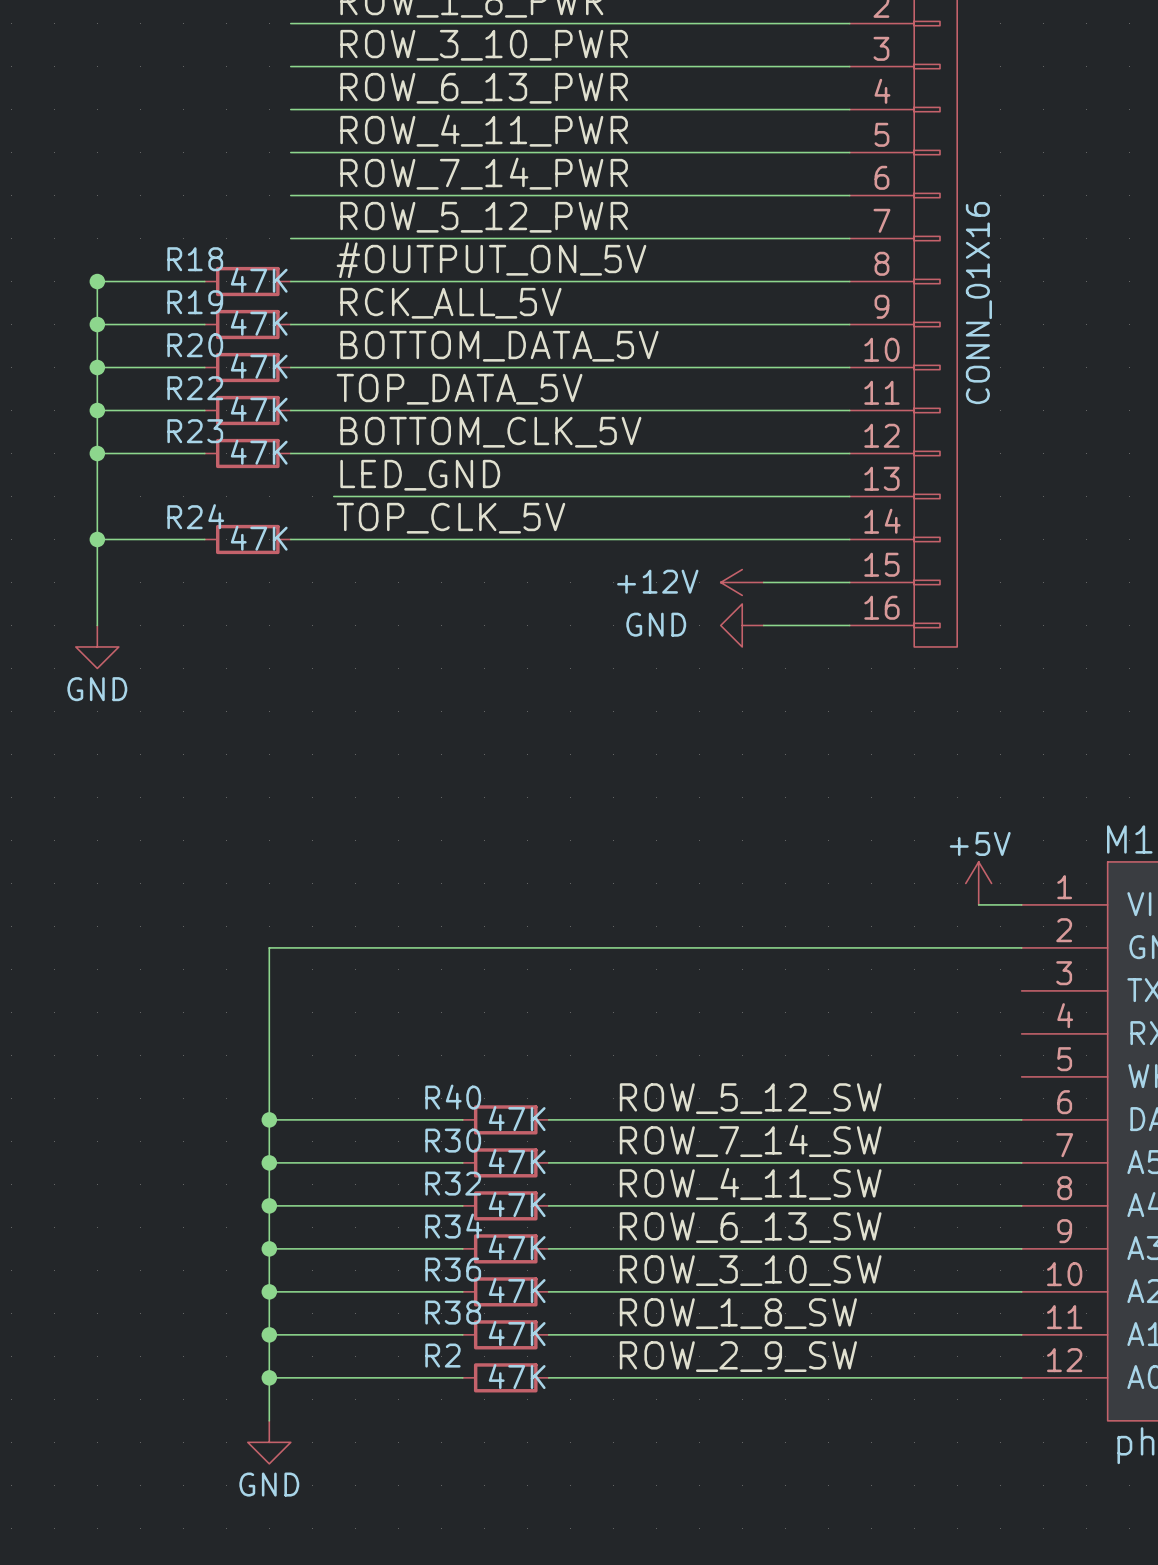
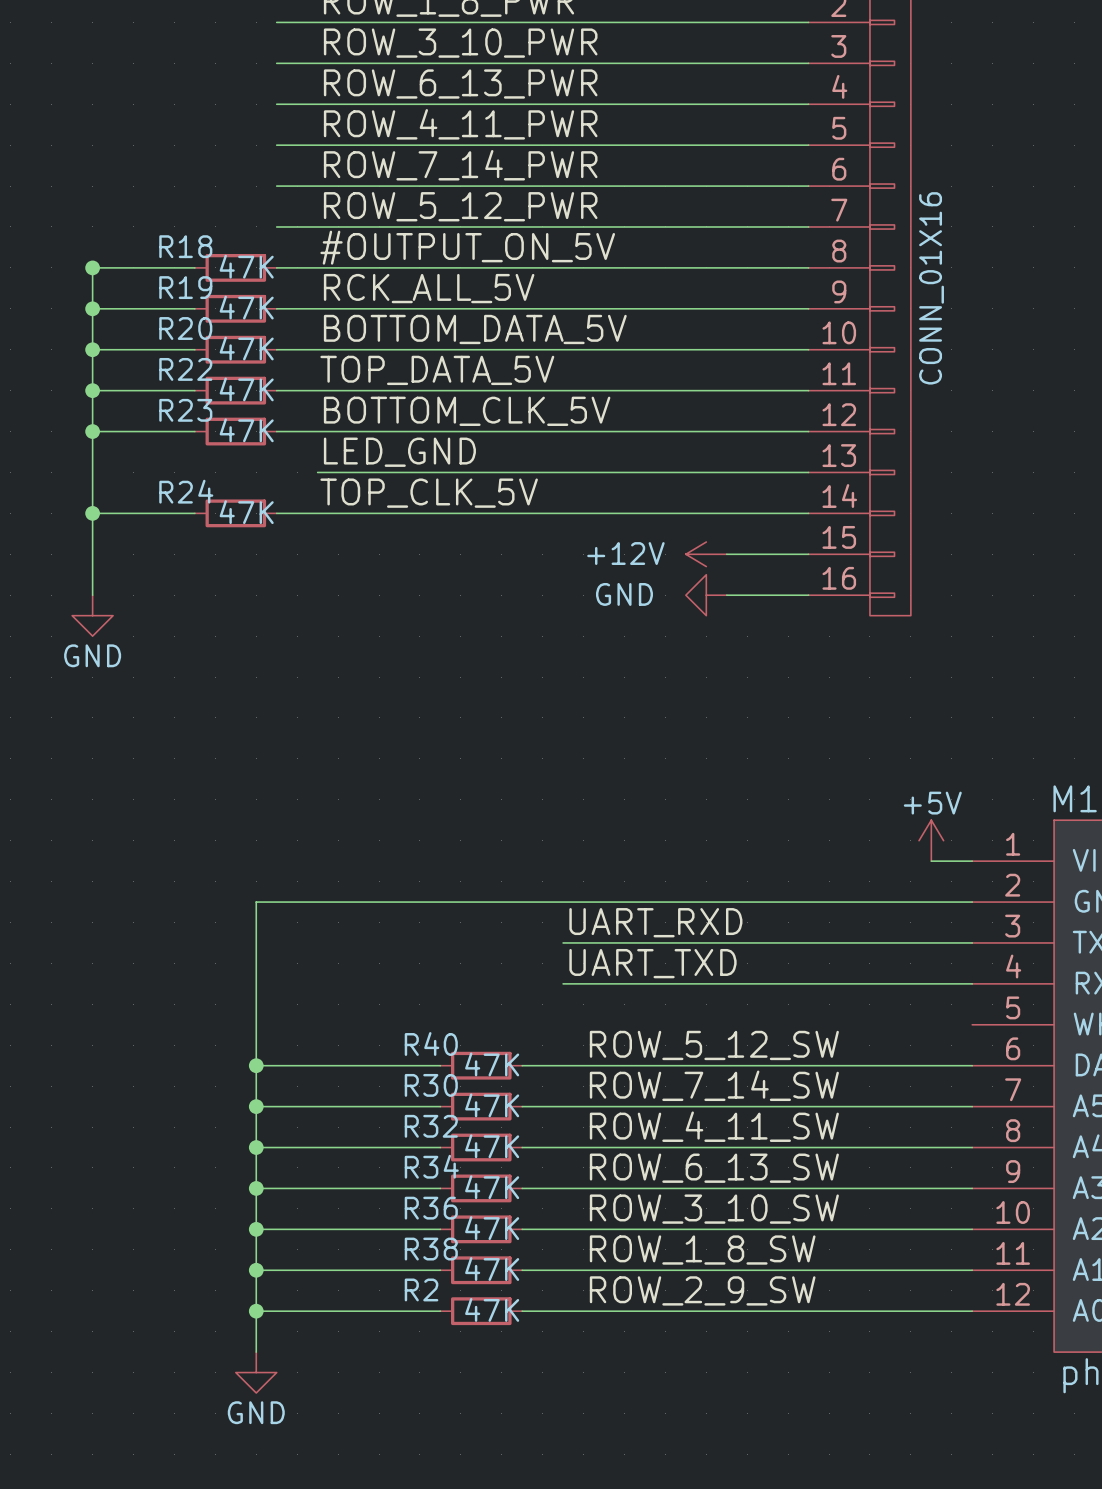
label: none -> UART_RXD (655, 922)
wire: none -> (563, 942) (972, 942)
label: none -> UART_TXD (652, 963)
wire: none -> (563, 983) (972, 983)

